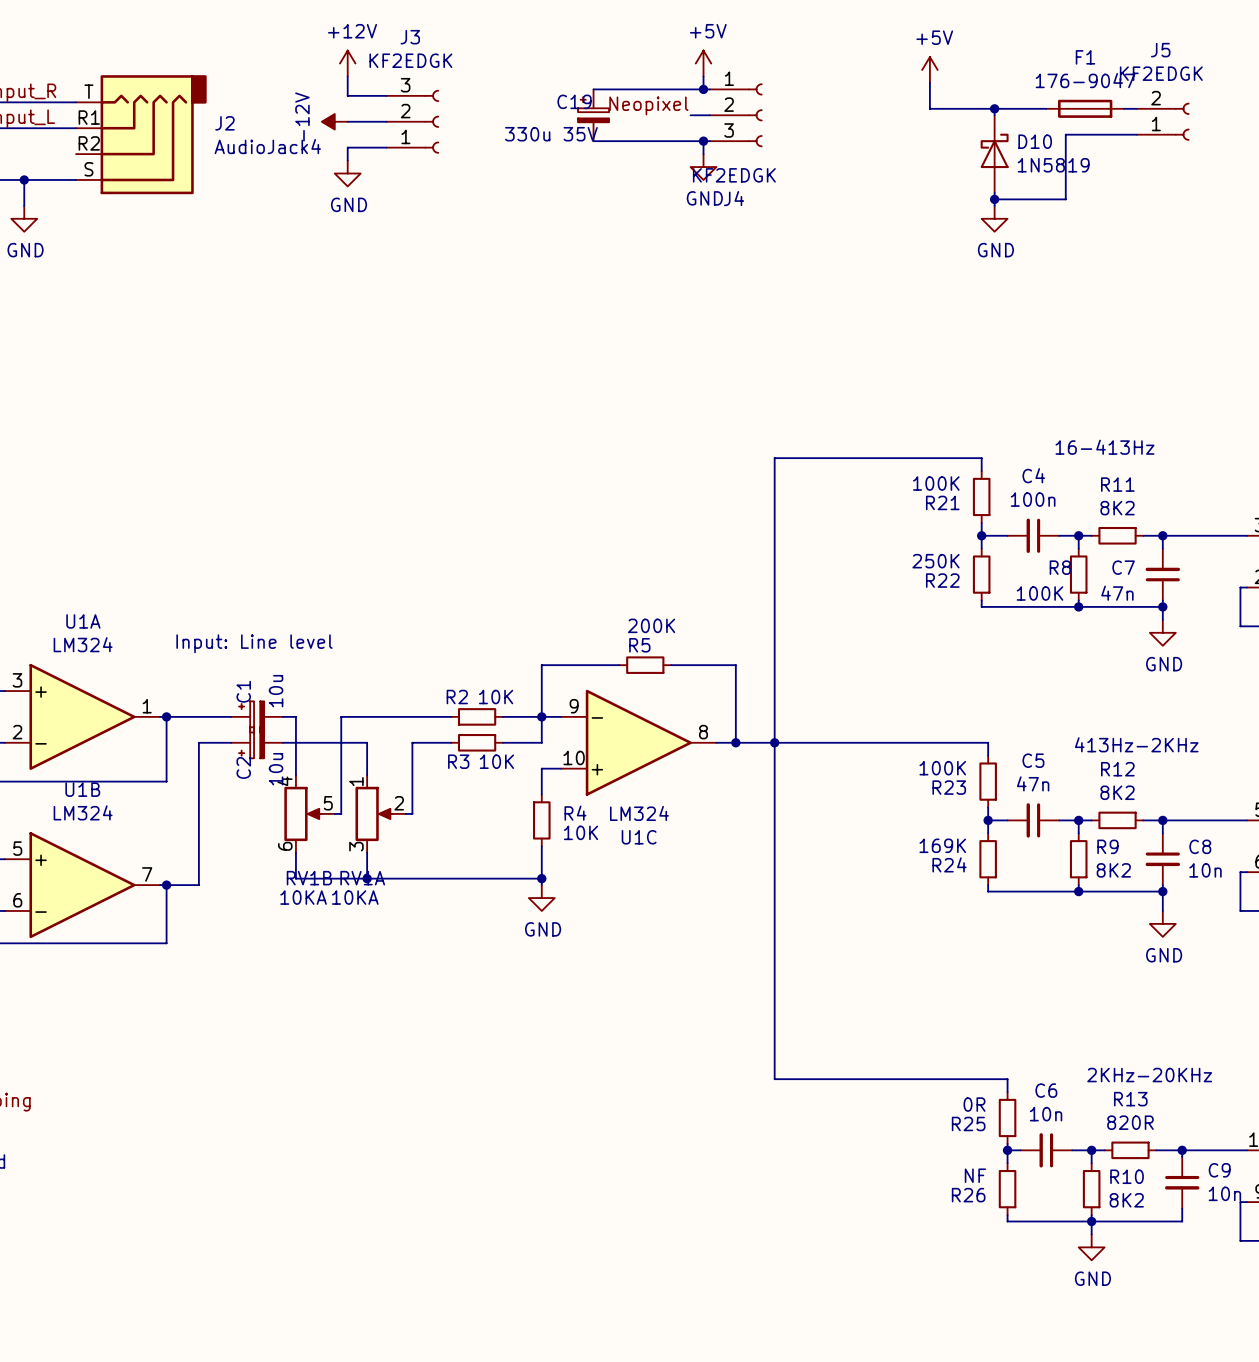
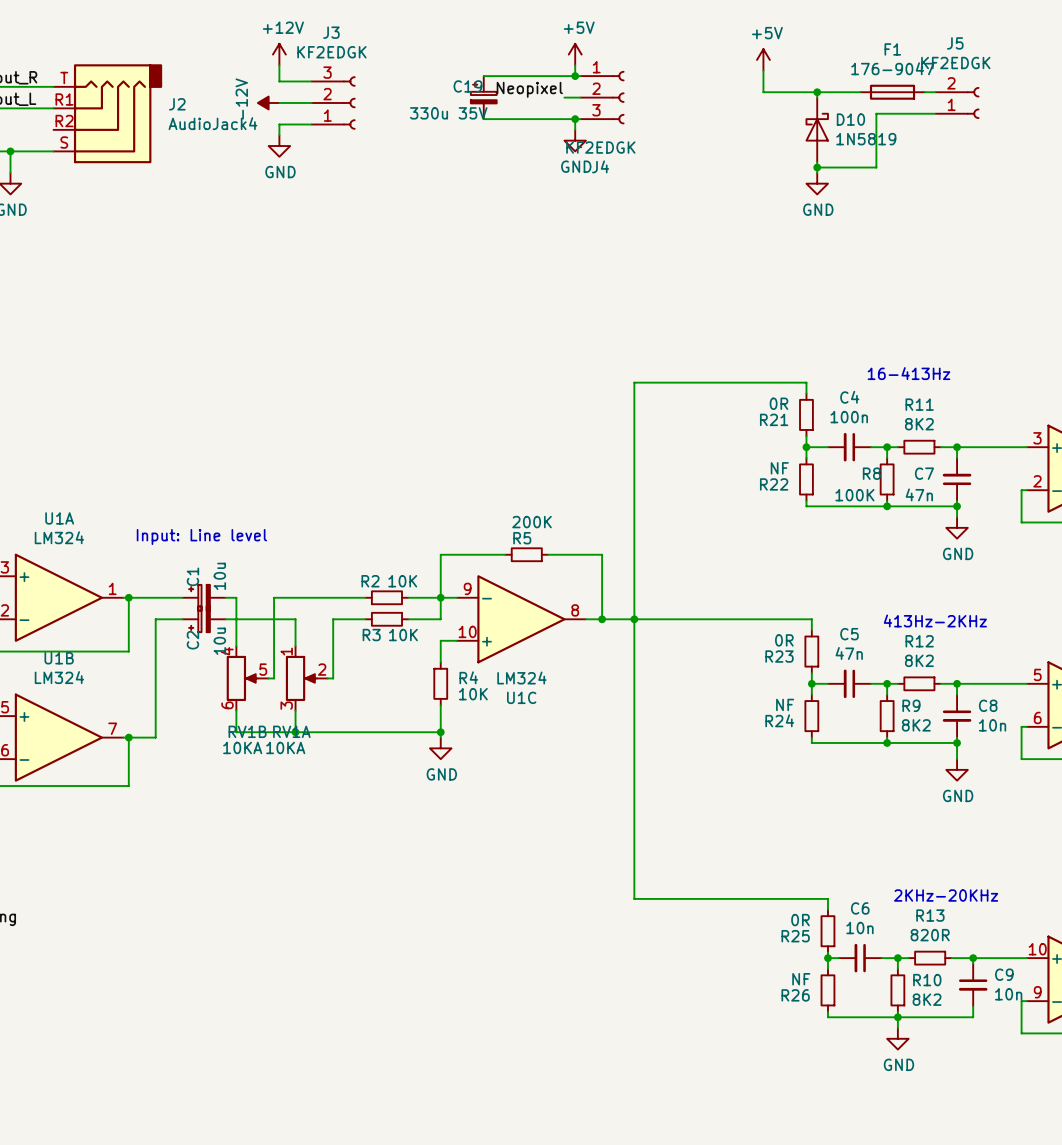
R21 value: 100K (936, 483) -> 0R (778, 403)
R22 value: 250K (935, 561) -> NF (779, 468)
R23 value: 100K (942, 768) -> 0R (784, 640)
R24 value: 169K (942, 845) -> NF (785, 704)

